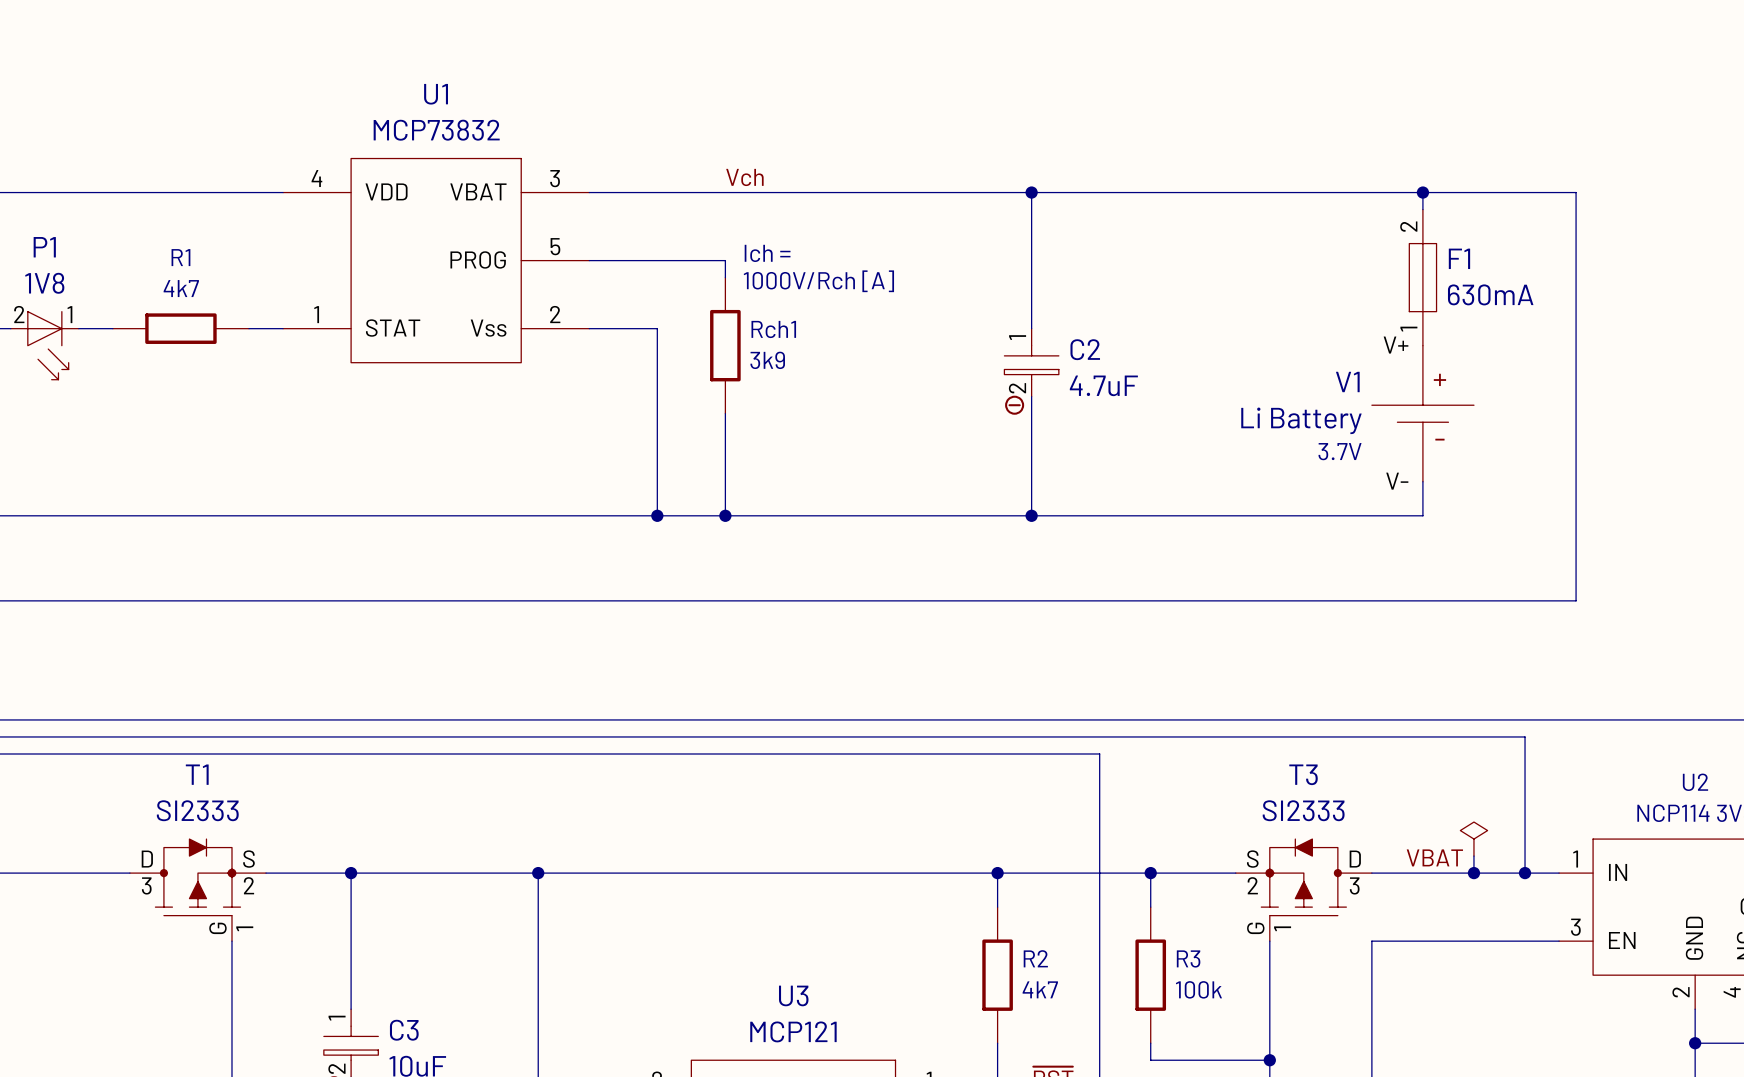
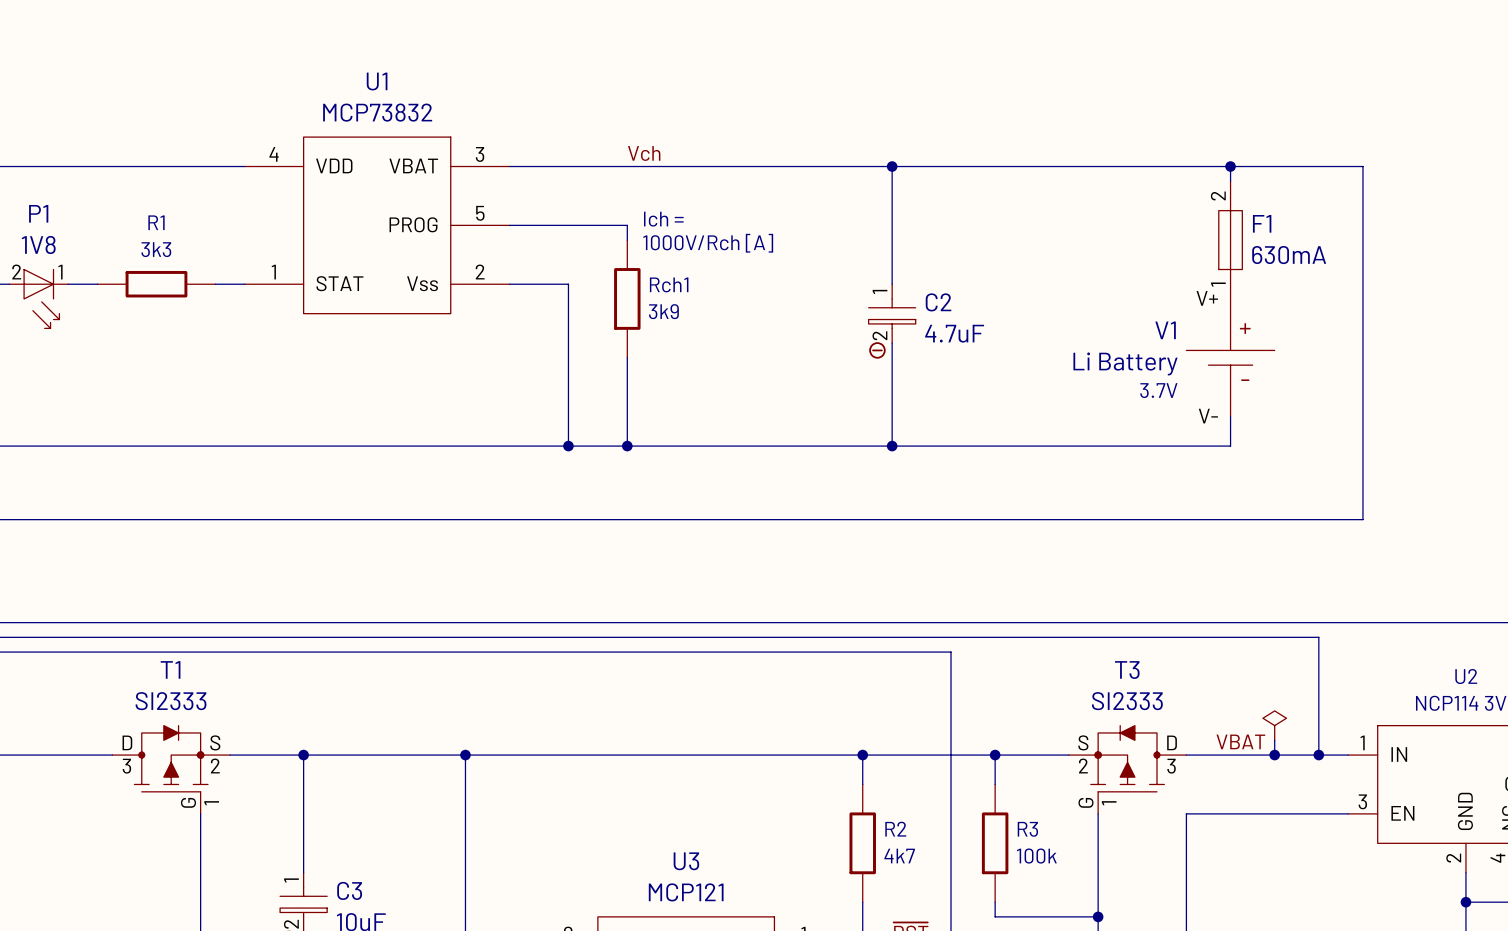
R1 value: 4k7 (181, 288) -> 3k3 (156, 249)

